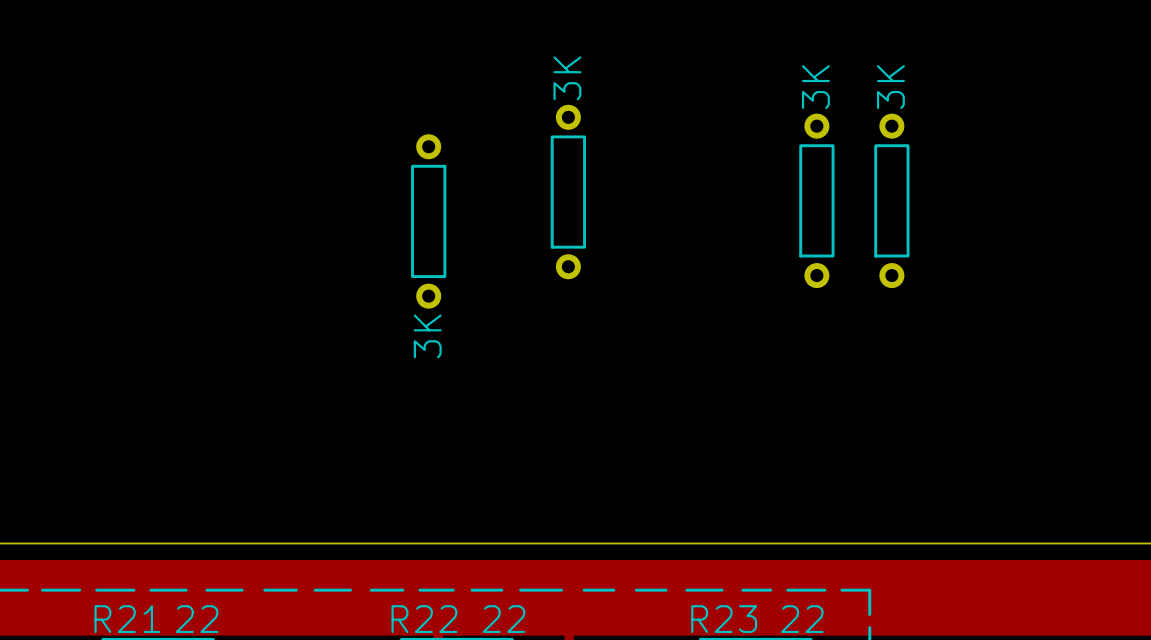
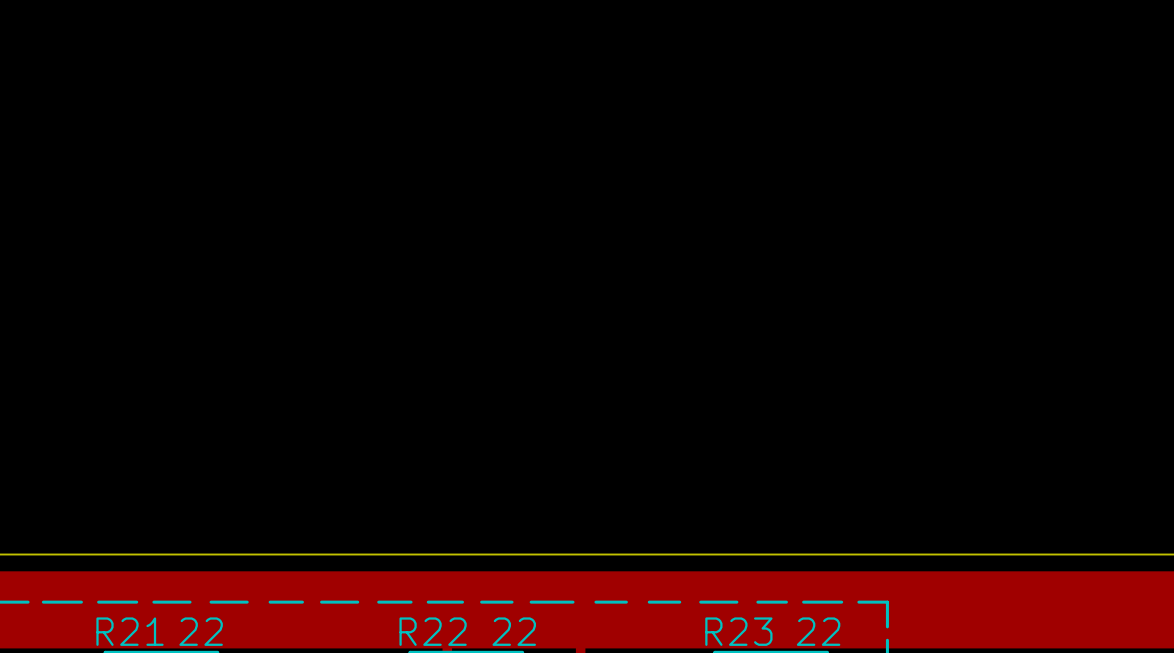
part: 3K (568, 192) -> none
part: 3K (816, 200) -> none
part: 3K (891, 200) -> none
part: 3K (428, 221) -> none

